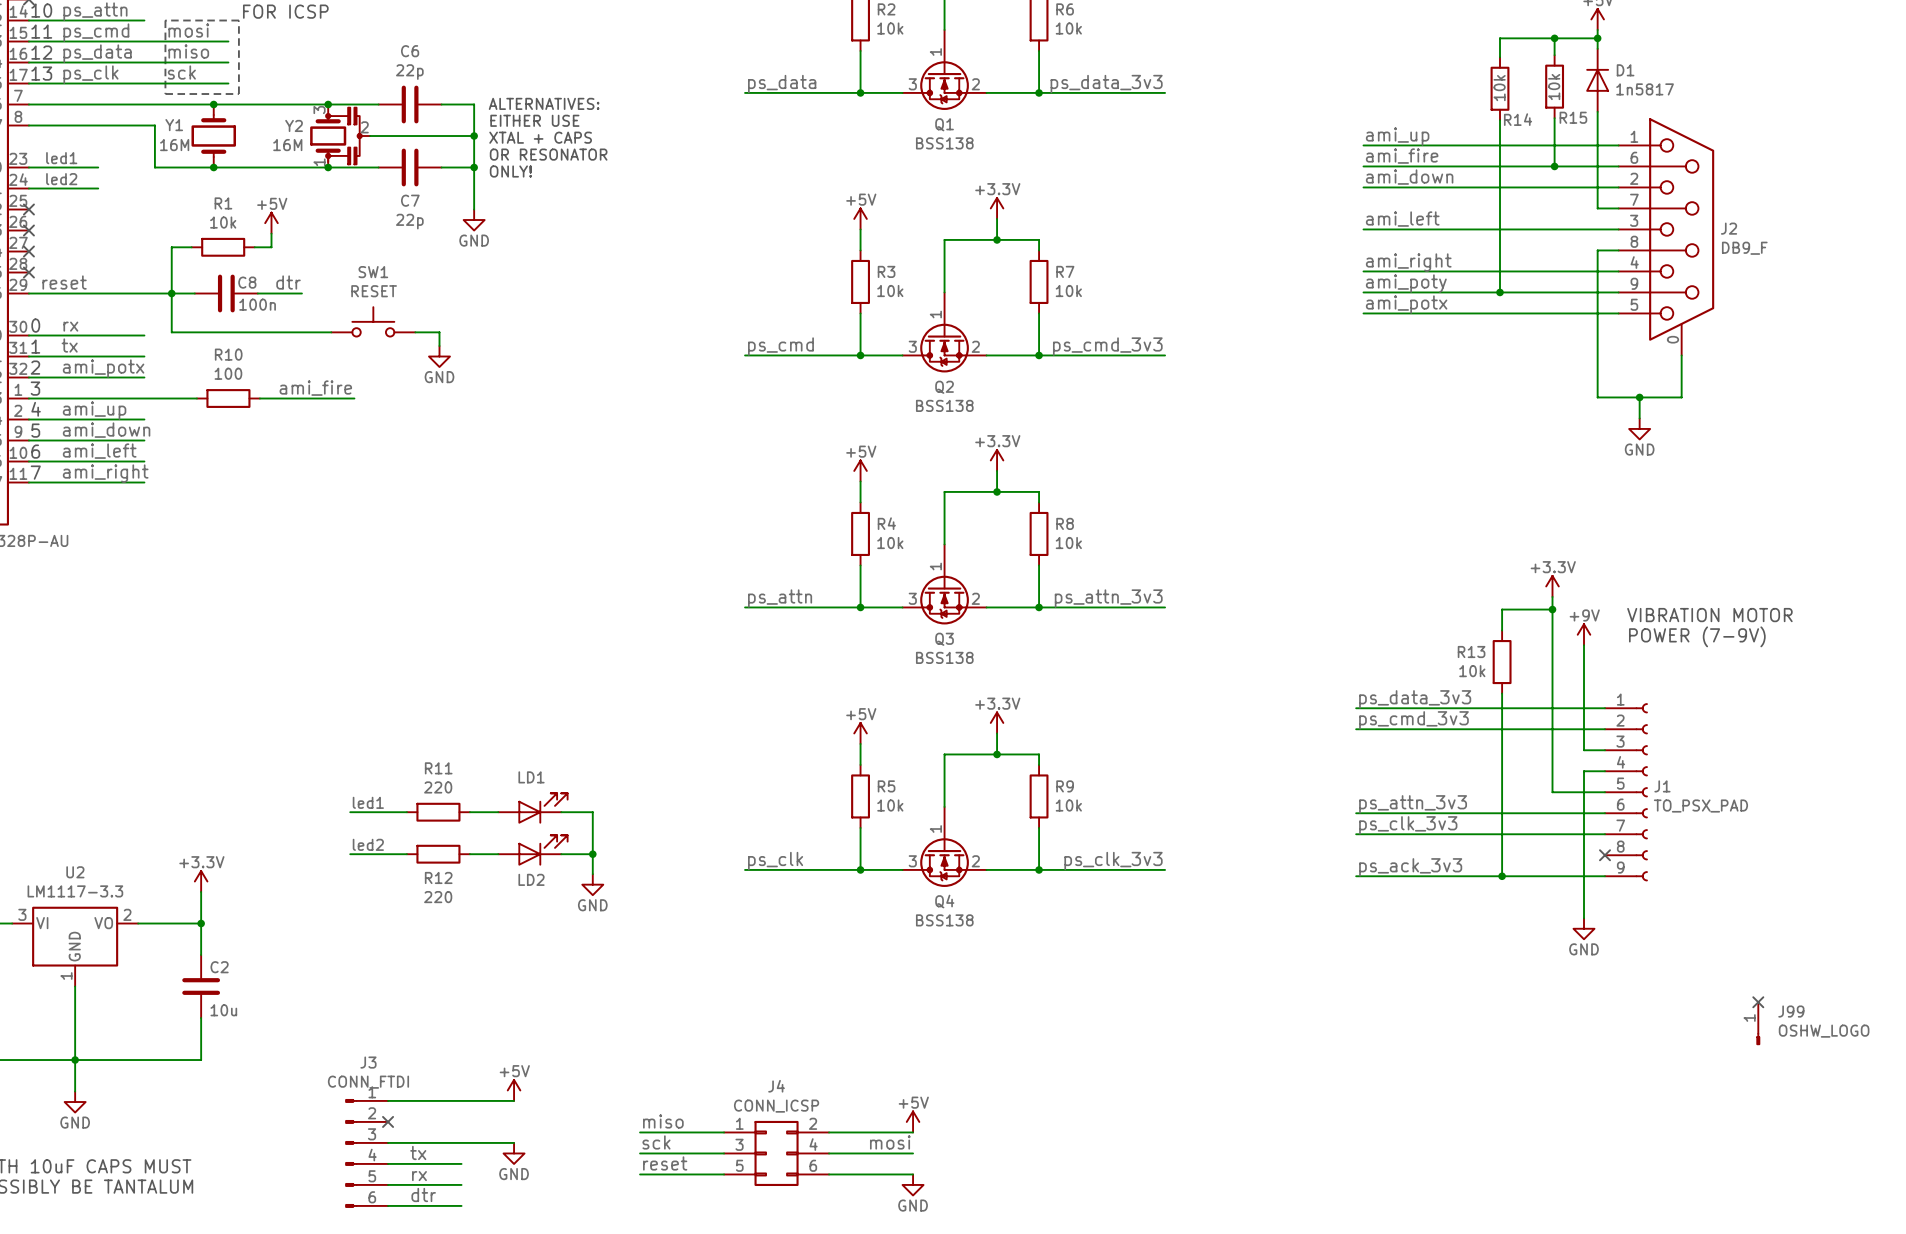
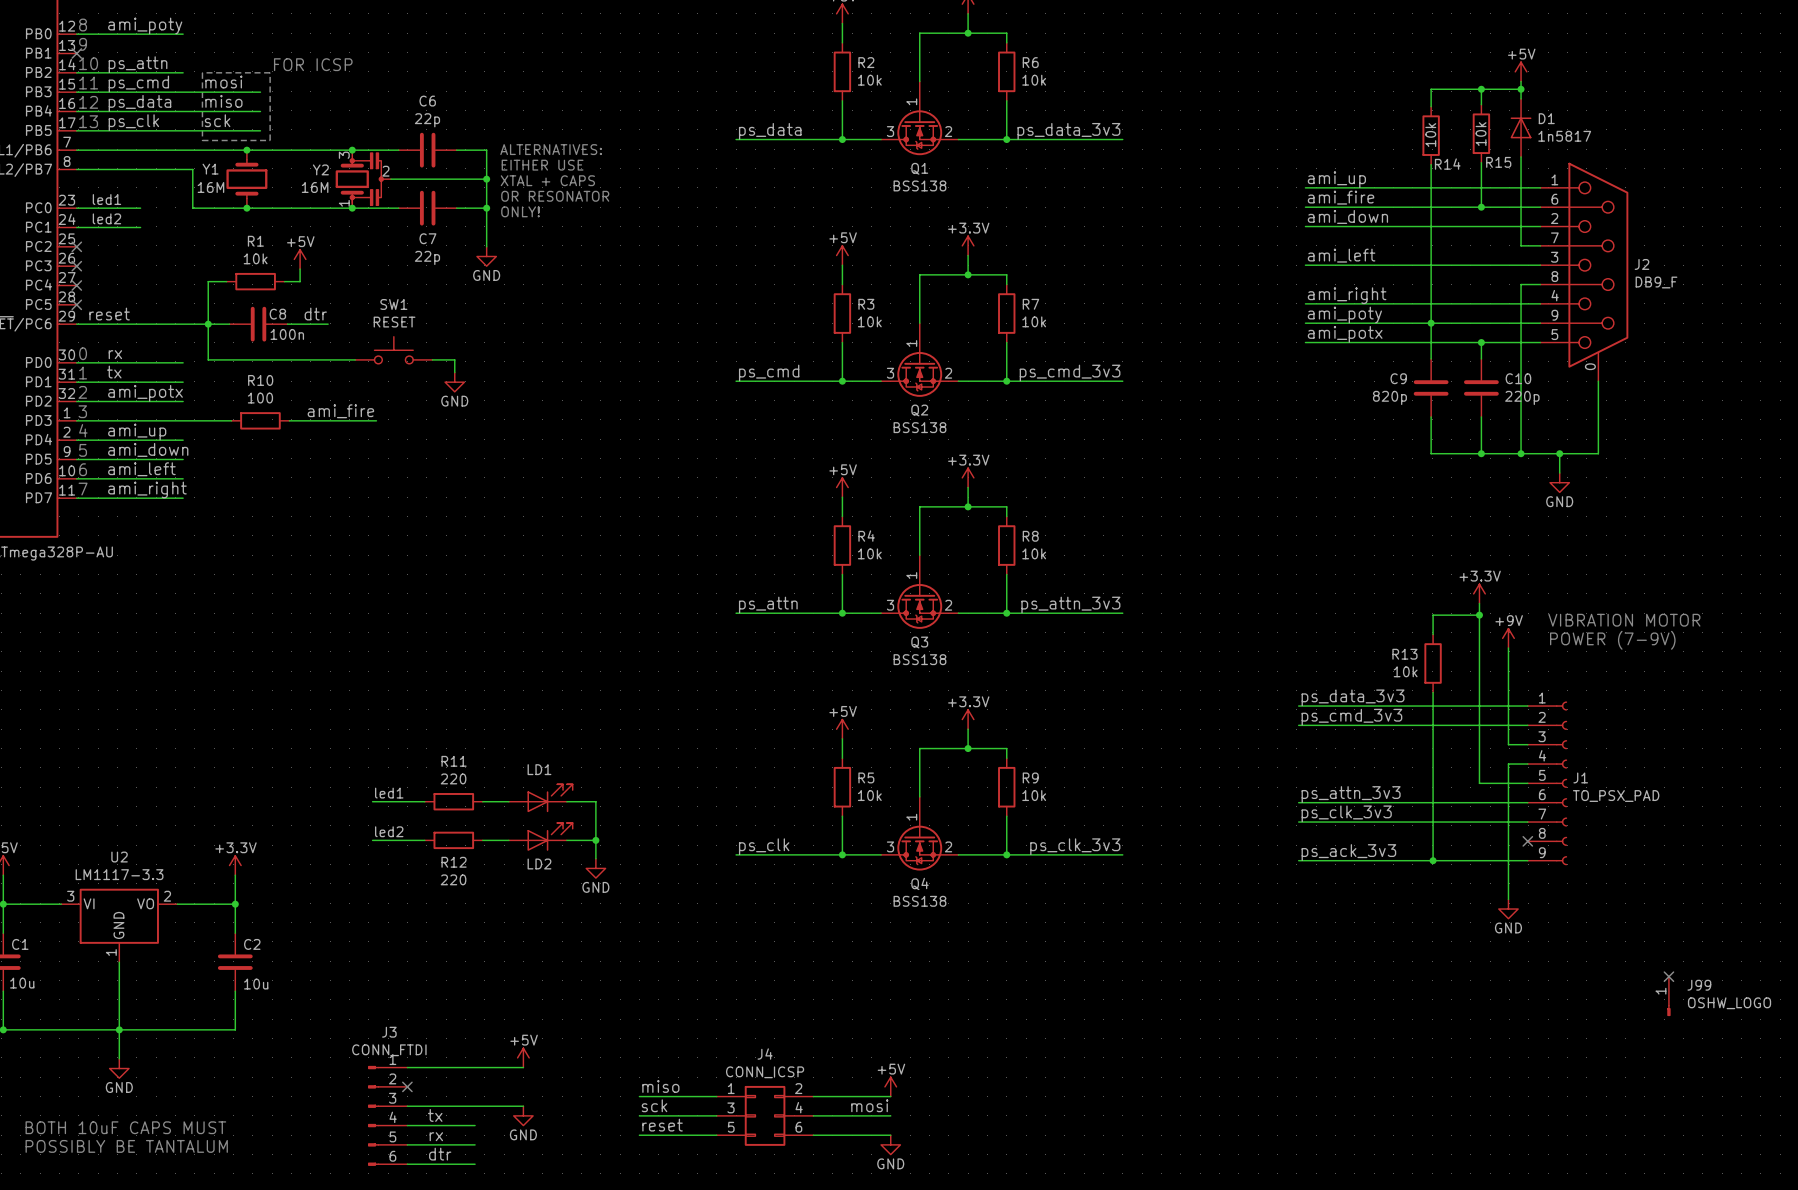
wire: none -> (1431, 323) (1431, 358)
wire: none -> (1481, 342) (1481, 358)
junction: none -> (1481, 342)
C9: none -> 820p (1431, 387)
C10: none -> 220p (1481, 387)
wire: none -> (1431, 416) (1431, 453) (1598, 453) (1598, 419)
wire: none -> (1481, 416) (1481, 453)
wire: (1597, 397) (1681, 397) -> (1521, 419) (1521, 453)
wire: (1639, 397) (1639, 418) -> (1559, 453) (1559, 473)
junction: (1639, 397) -> none
power symbol position: GND (1639, 428) -> GND (1559, 482)
junction: none -> (1481, 453)
junction: none -> (1521, 453)
junction: none -> (1559, 453)

